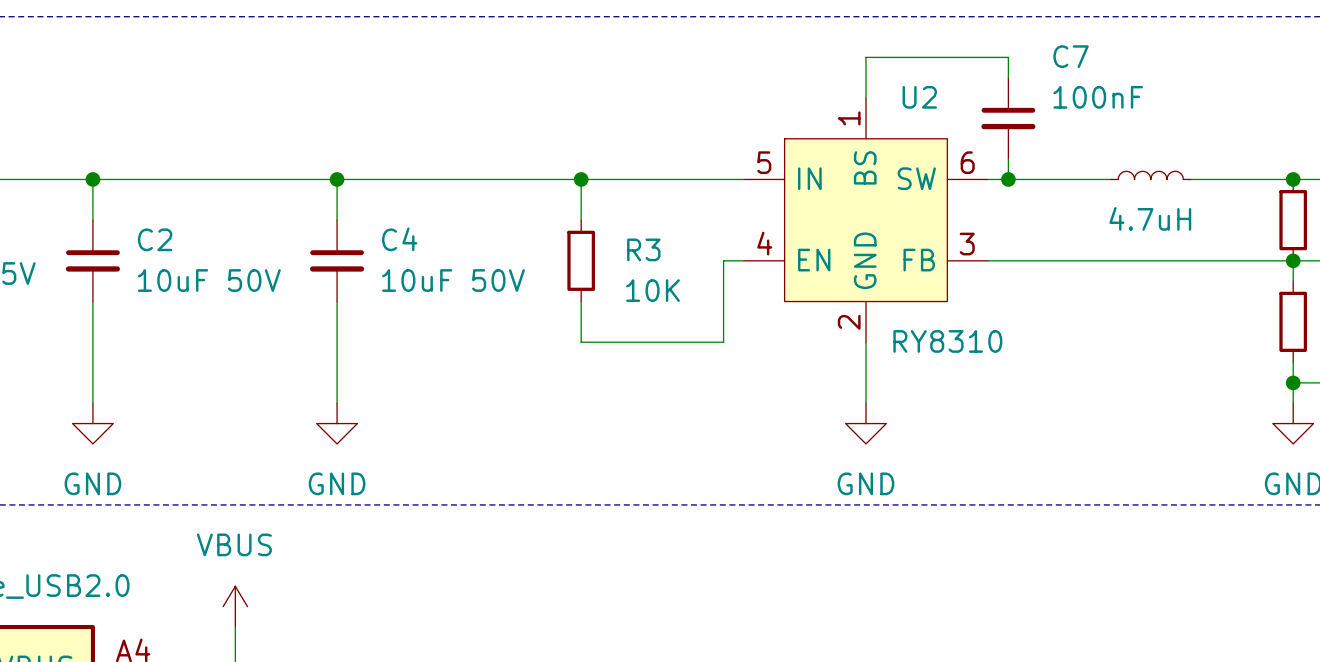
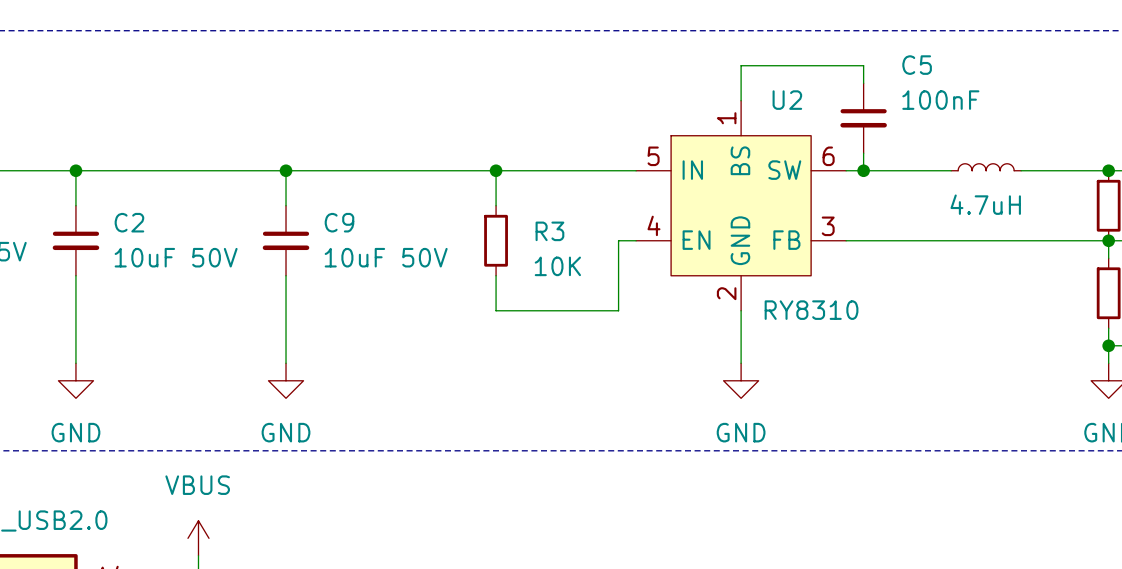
C7 name: C7 (1071, 56) -> C5 (917, 65)
C4 name: C4 (399, 239) -> C9 (339, 222)

